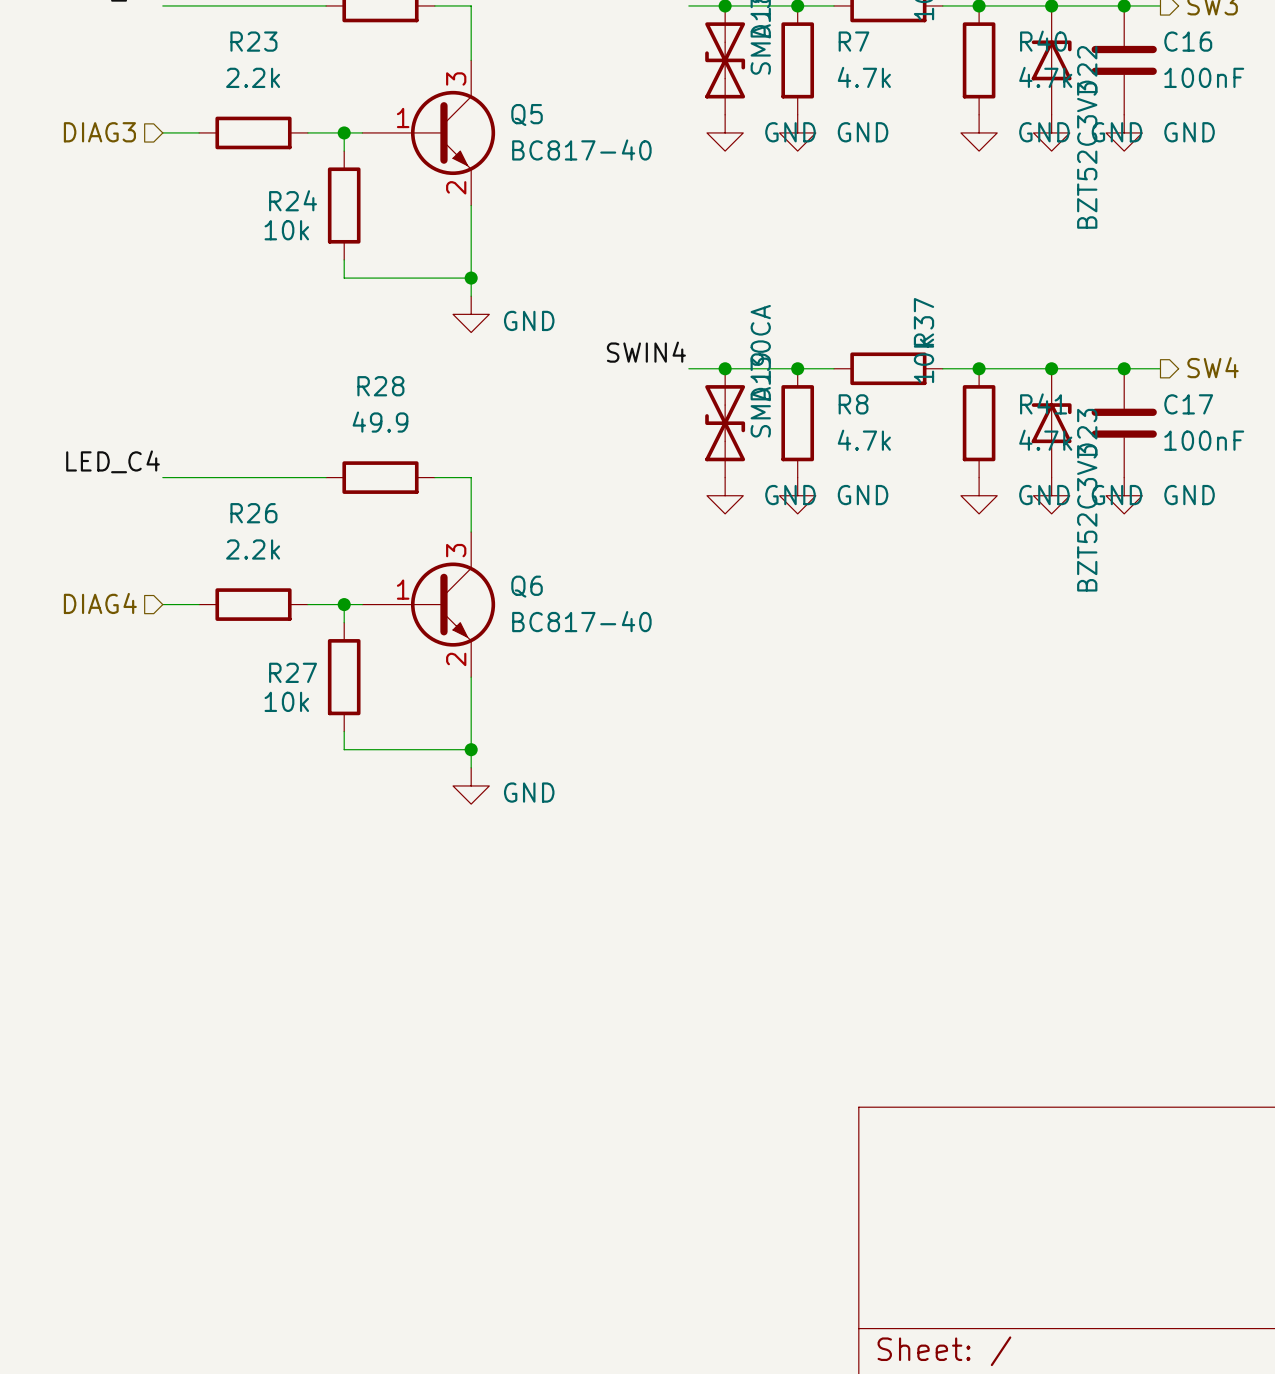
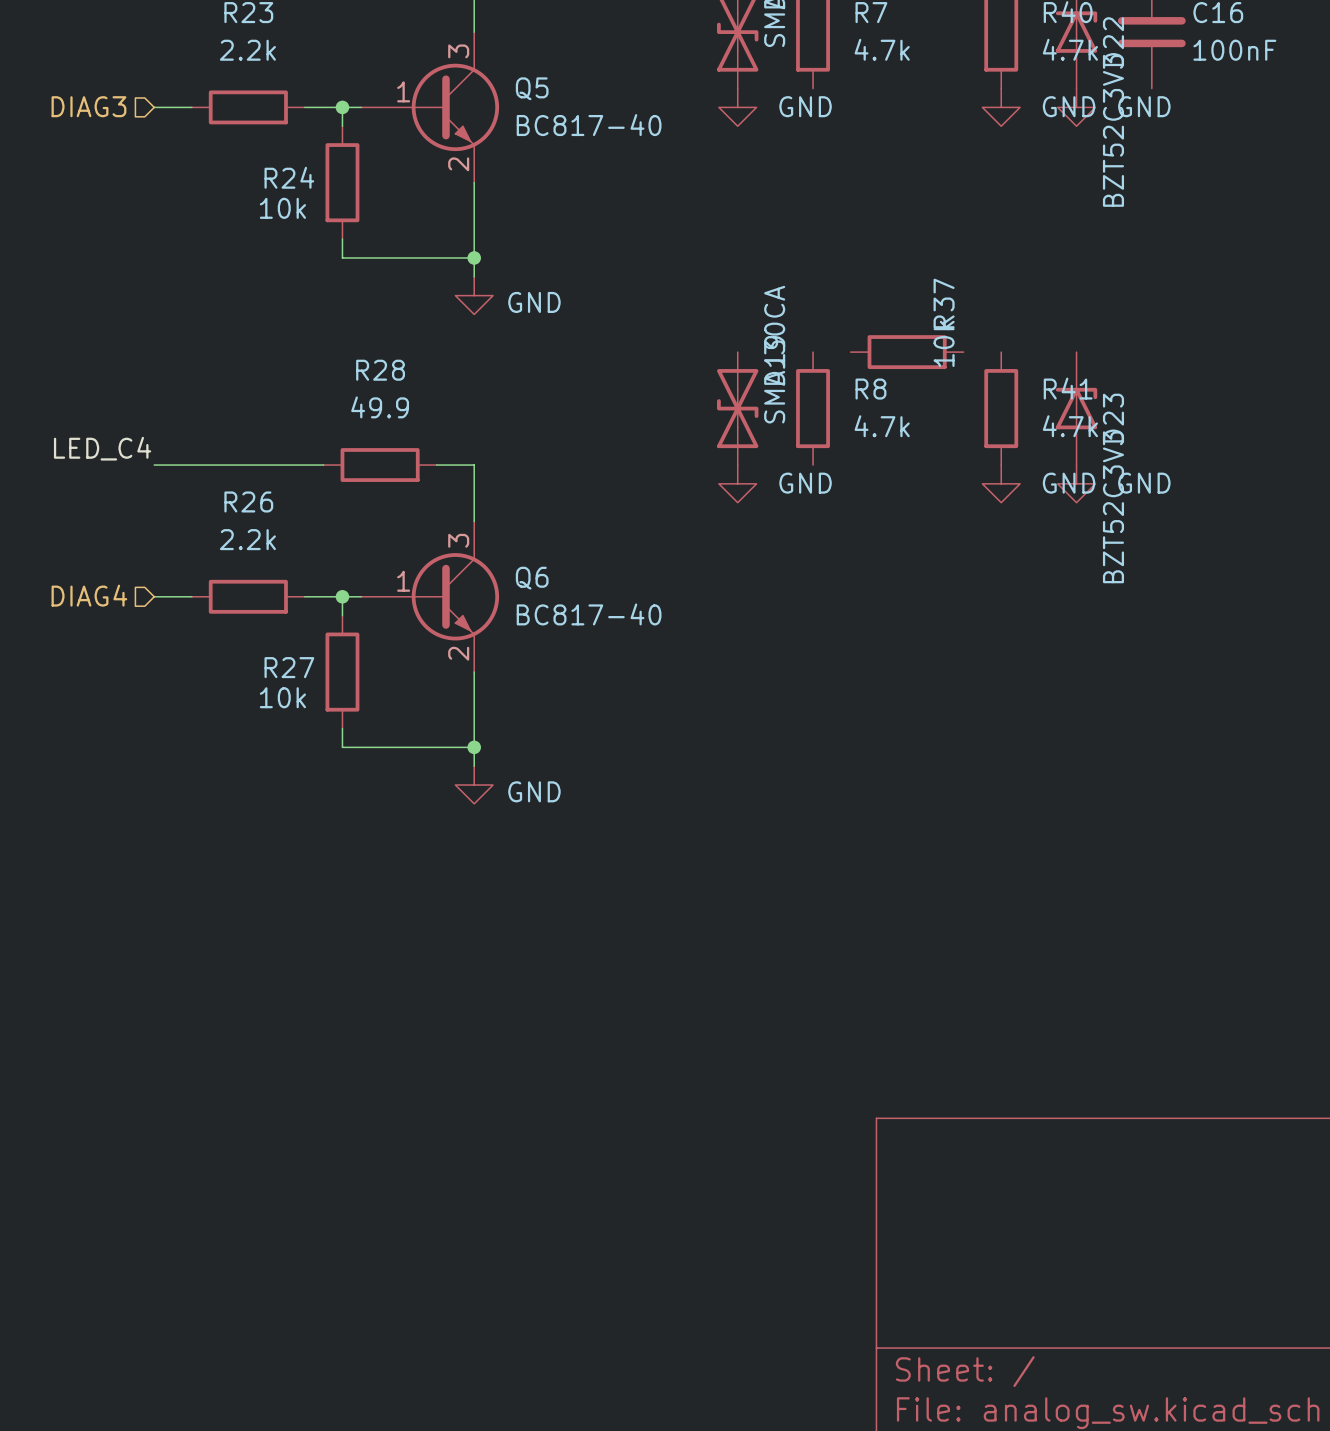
power symbol: GND (797, 132) -> none
power symbol: GND (1124, 132) -> none
label: SWIN4 (646, 352) -> none
hierarchical label: SW4 (1213, 367) -> none
wire: (688, 368) (833, 368) -> none
junction: (725, 368) -> none
junction: (797, 368) -> none
wire: (942, 368) (1160, 368) -> none
junction: (979, 368) -> none
junction: (1051, 368) -> none
junction: (1124, 368) -> none
C17: 100nF (1124, 423) -> none
power symbol: GND (797, 495) -> none
power symbol: GND (1124, 495) -> none

